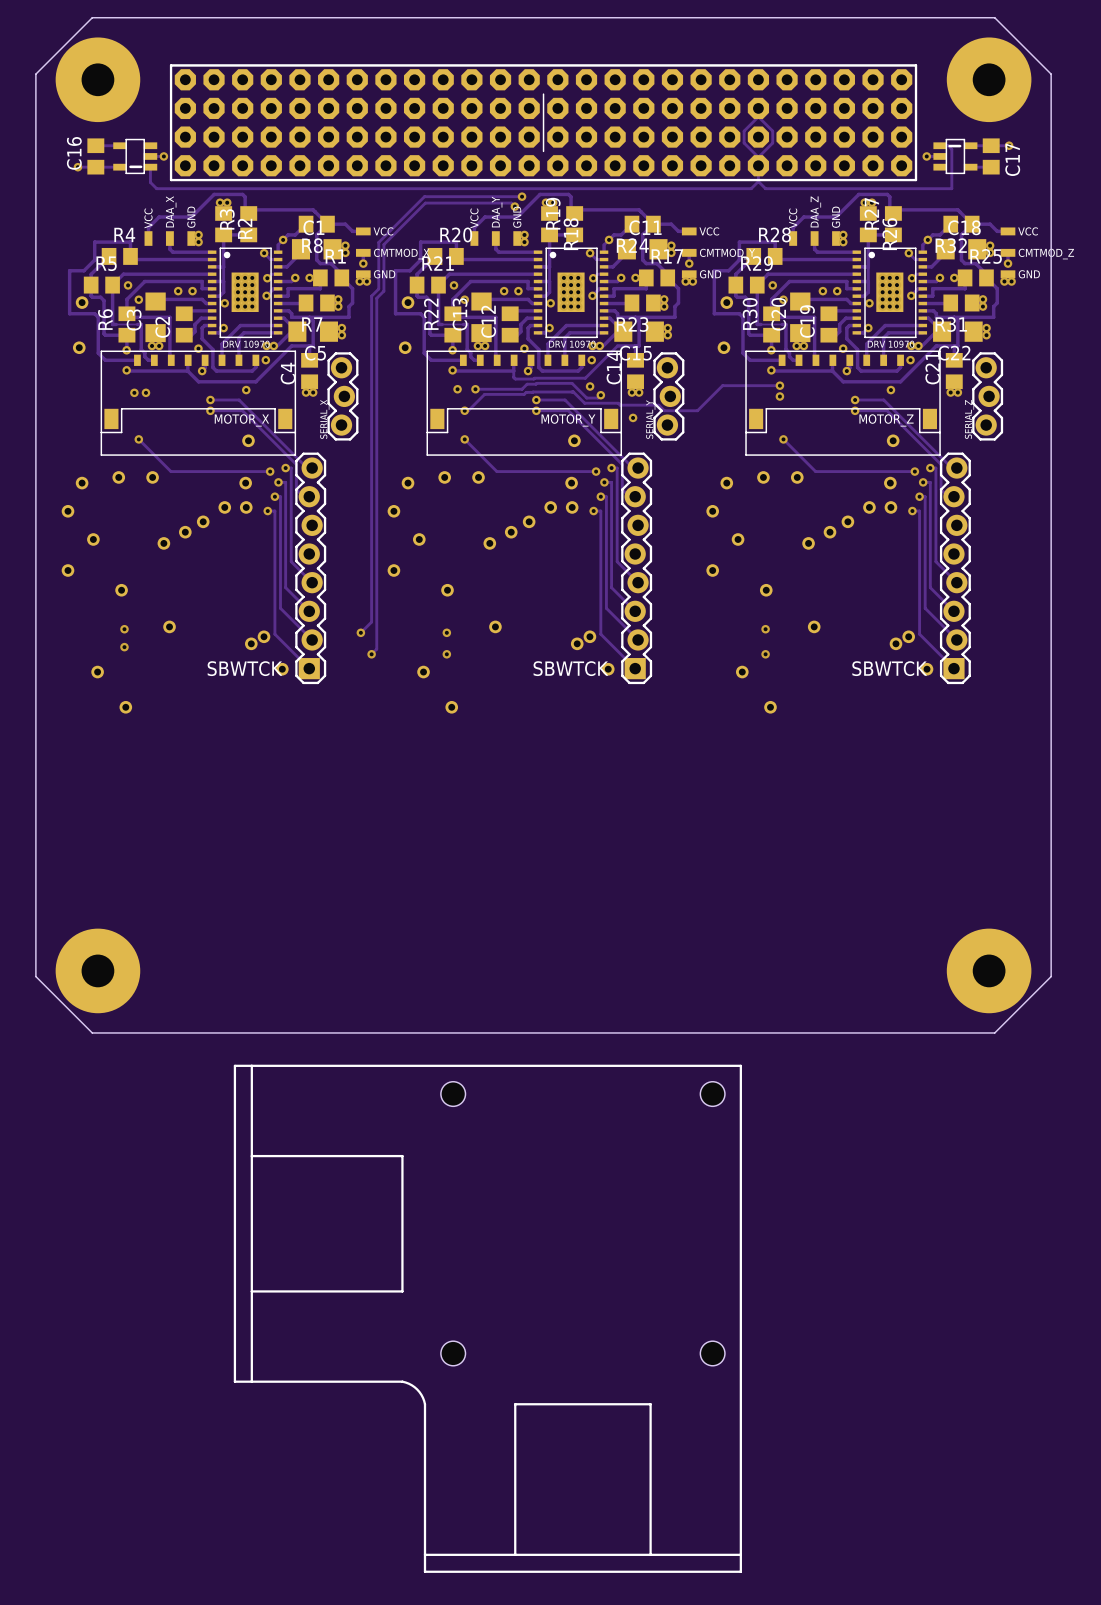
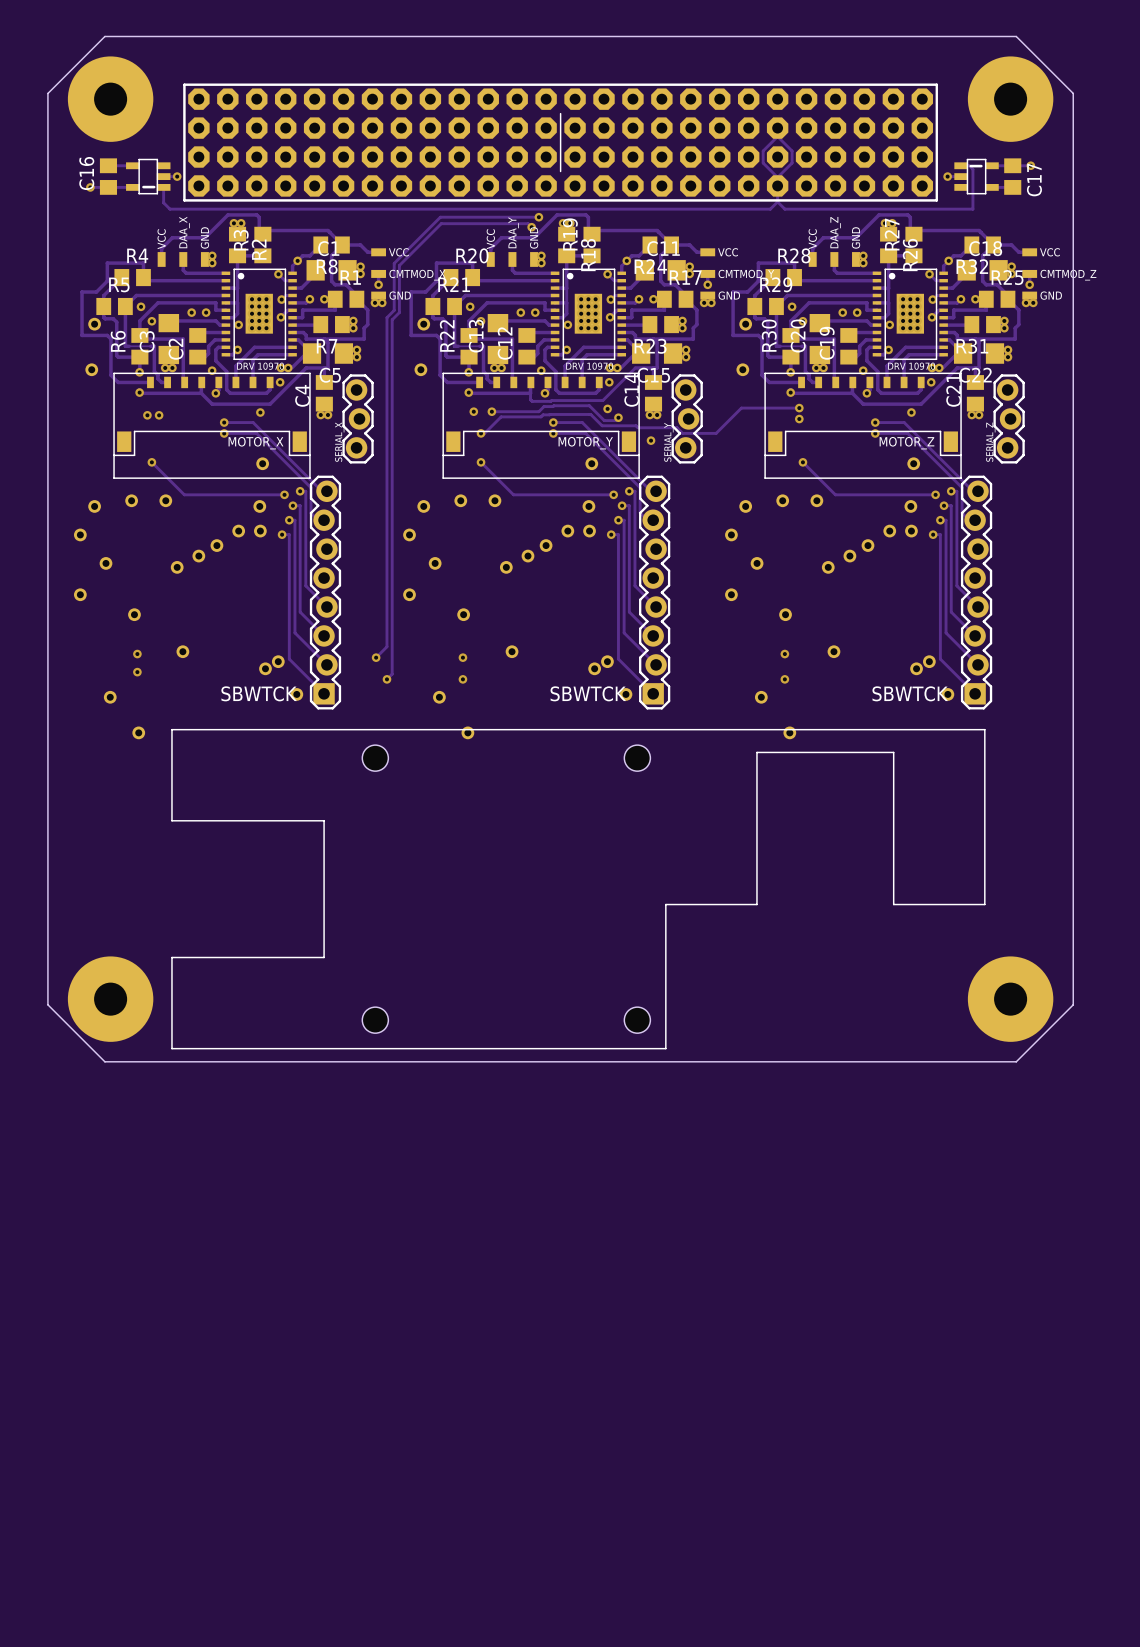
part: none -> (578, 889)
part: (487, 1318) -> none

